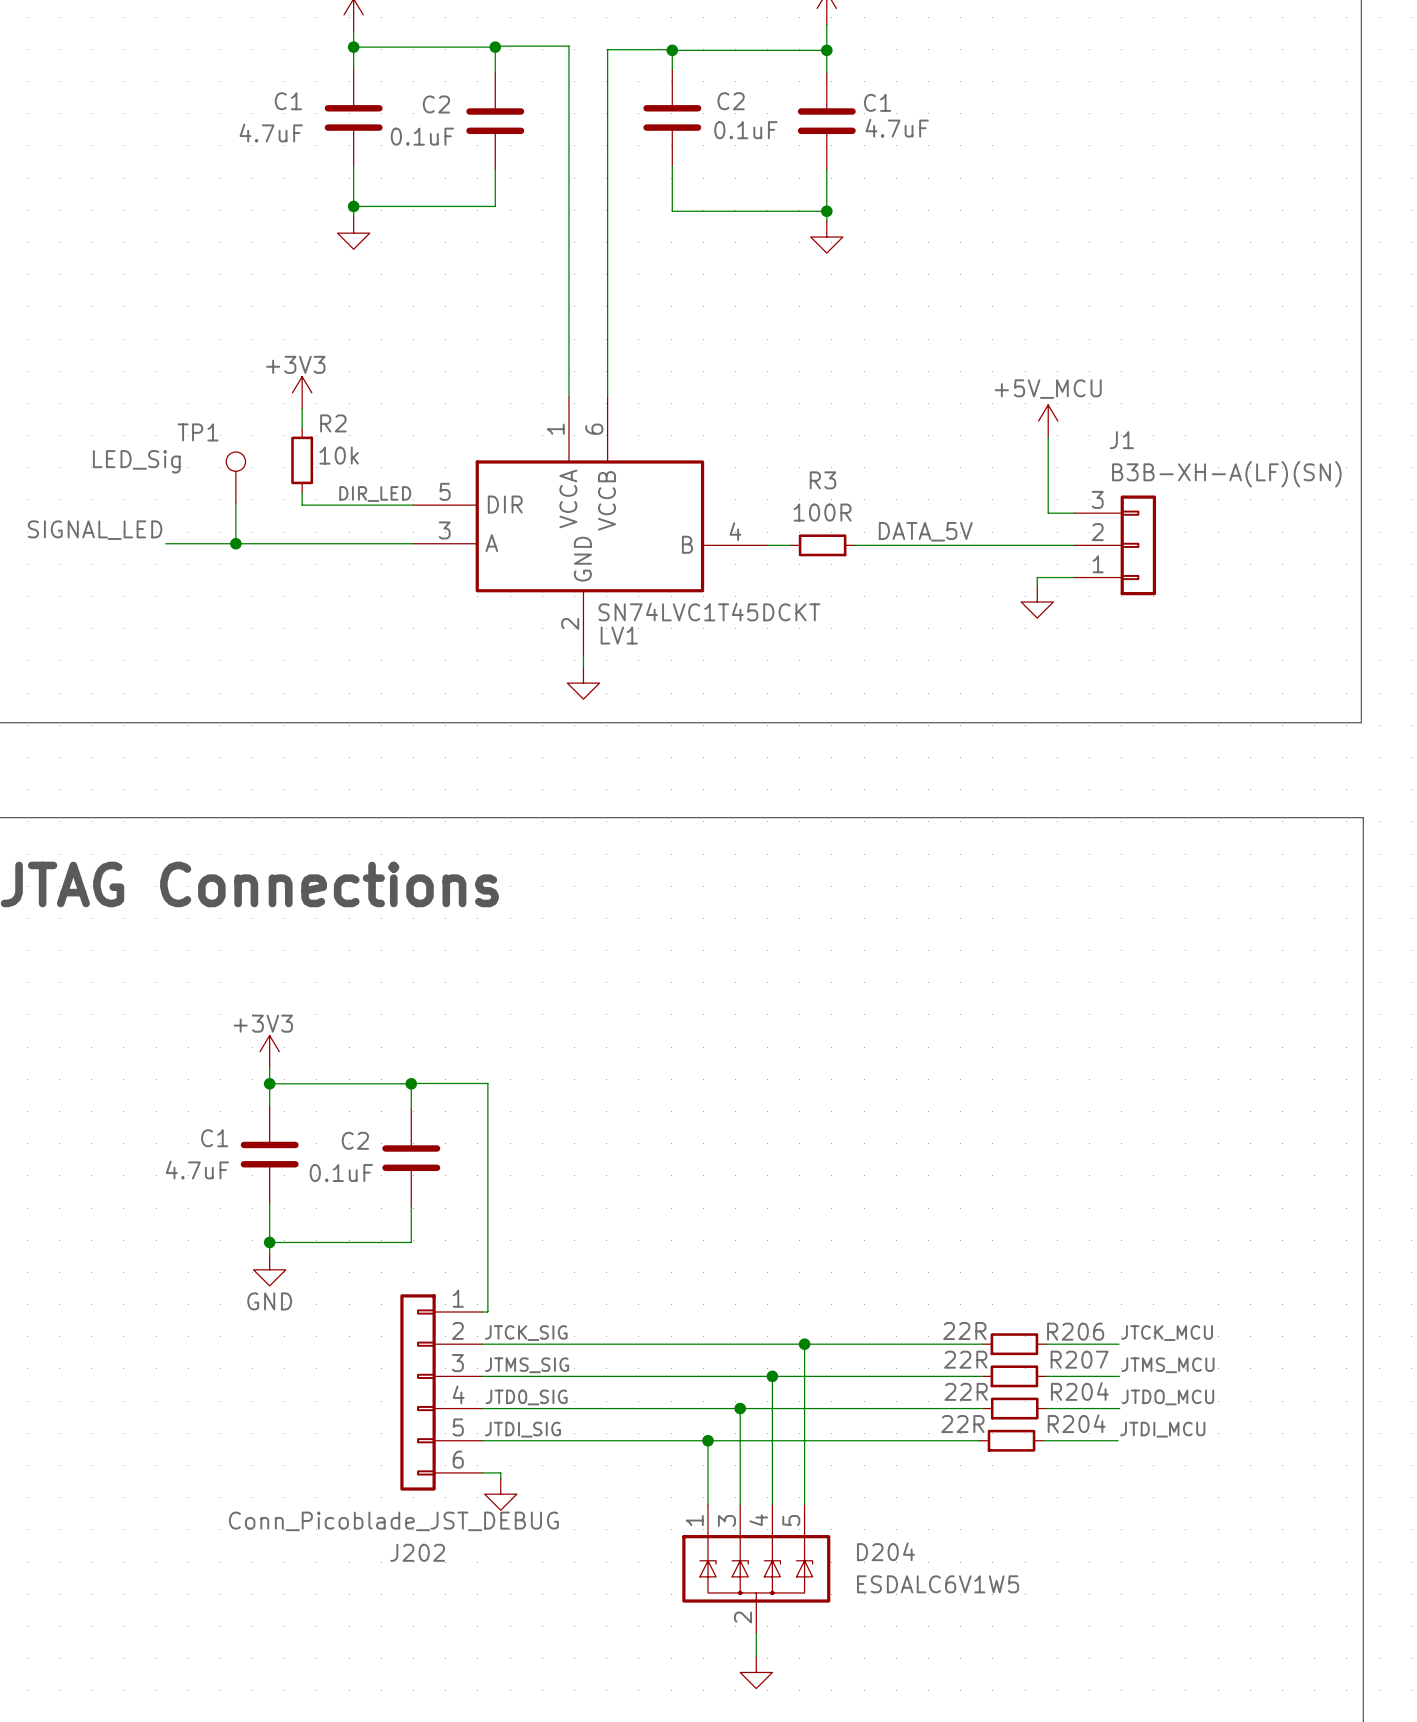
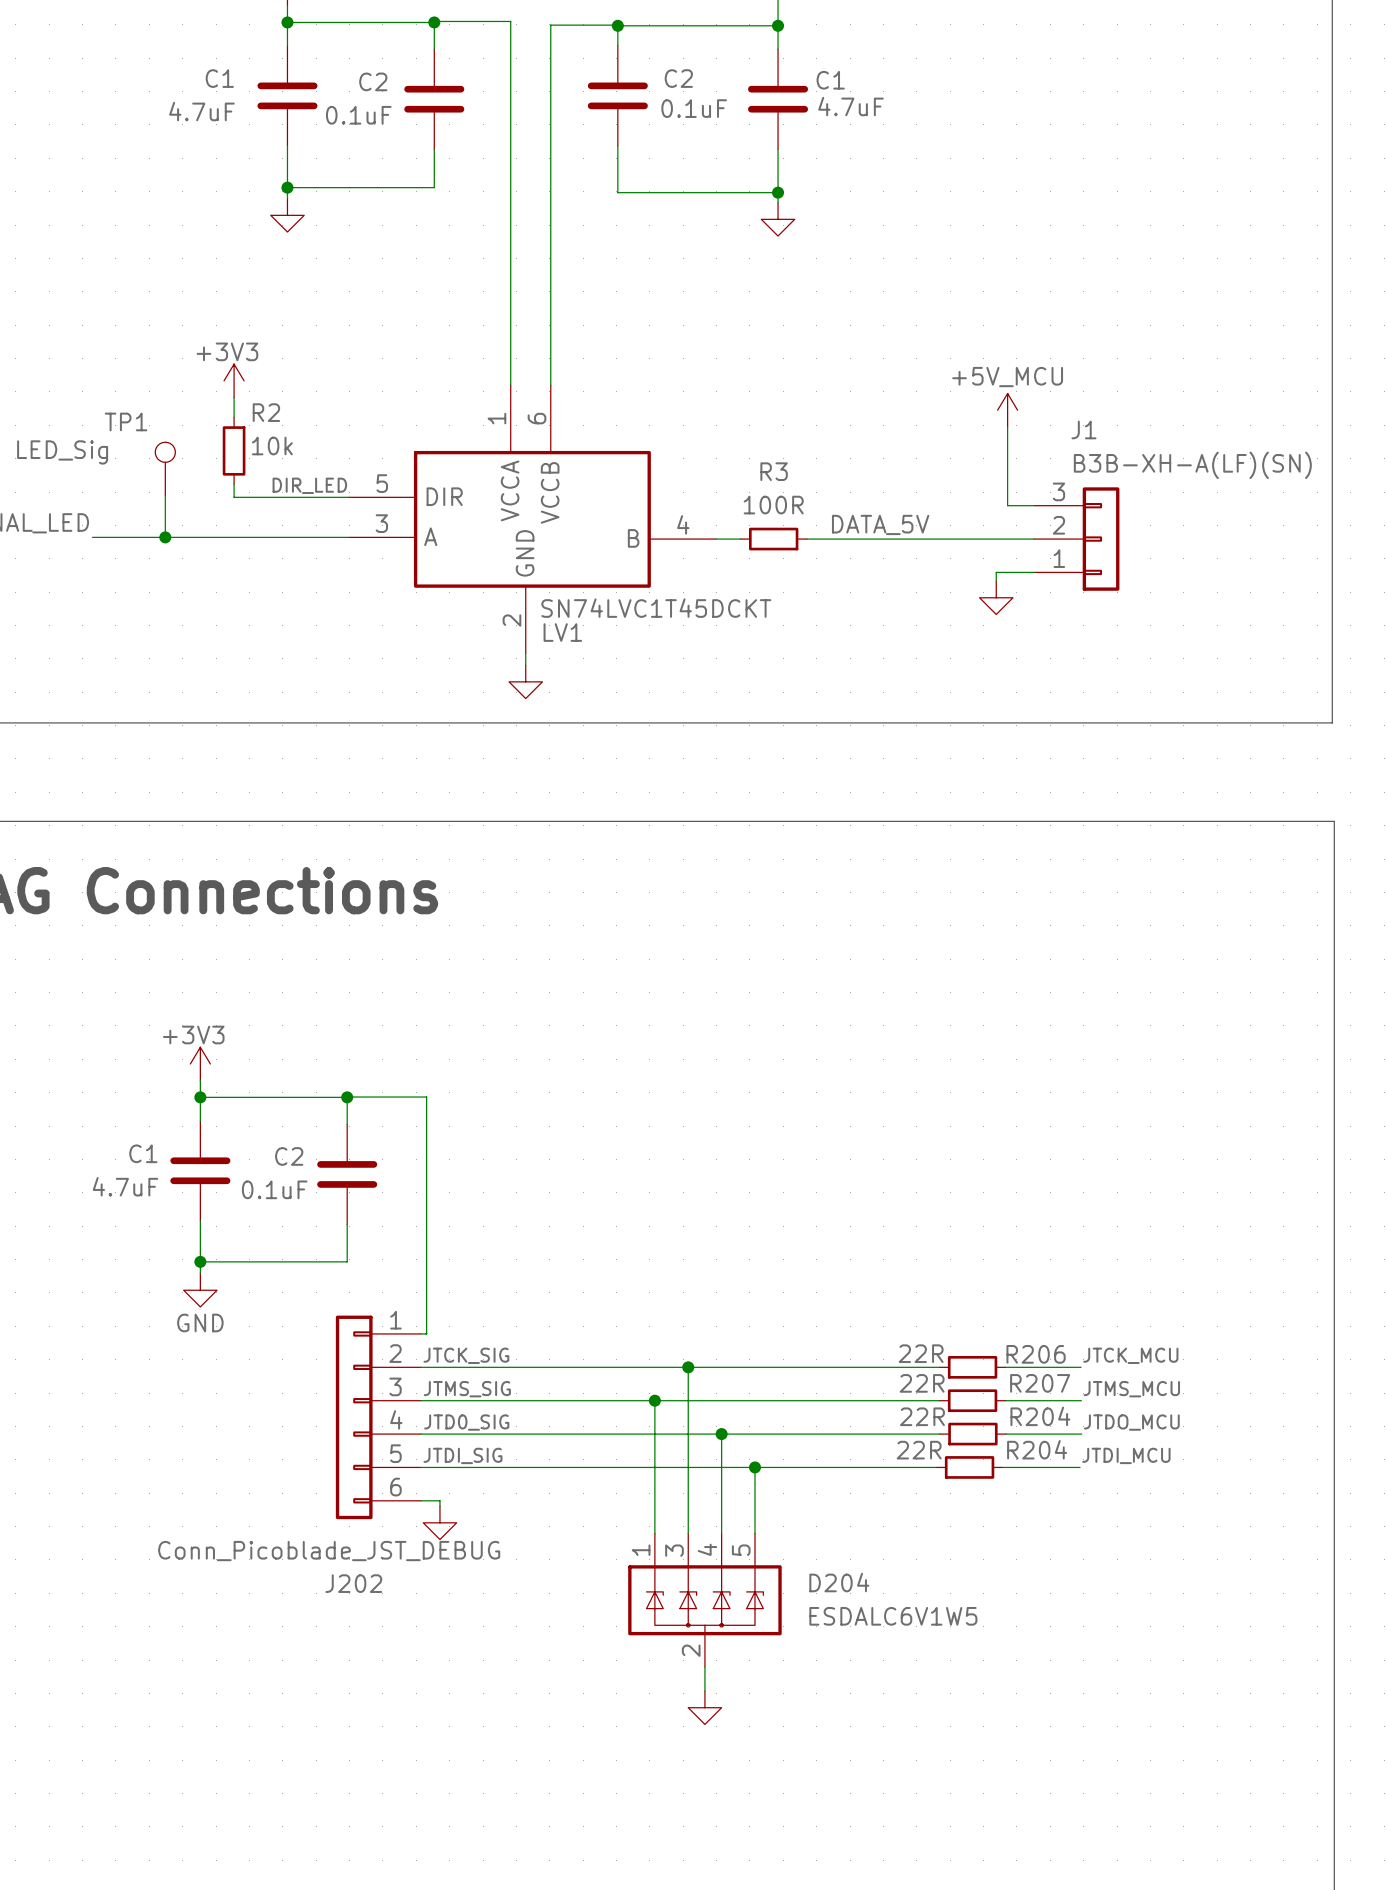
wire: none -> (688, 1367) (688, 1434)
junction: none -> (688, 1367)
wire: (804, 1344) (804, 1440) -> none
junction: (804, 1344) -> none
wire: none -> (654, 1400) (654, 1467)
junction: none -> (654, 1400)
wire: (772, 1376) (772, 1408) -> none
junction: (772, 1376) -> none
junction: (740, 1408) -> none
junction: none -> (721, 1434)
junction: (708, 1440) -> none
junction: none -> (754, 1467)

